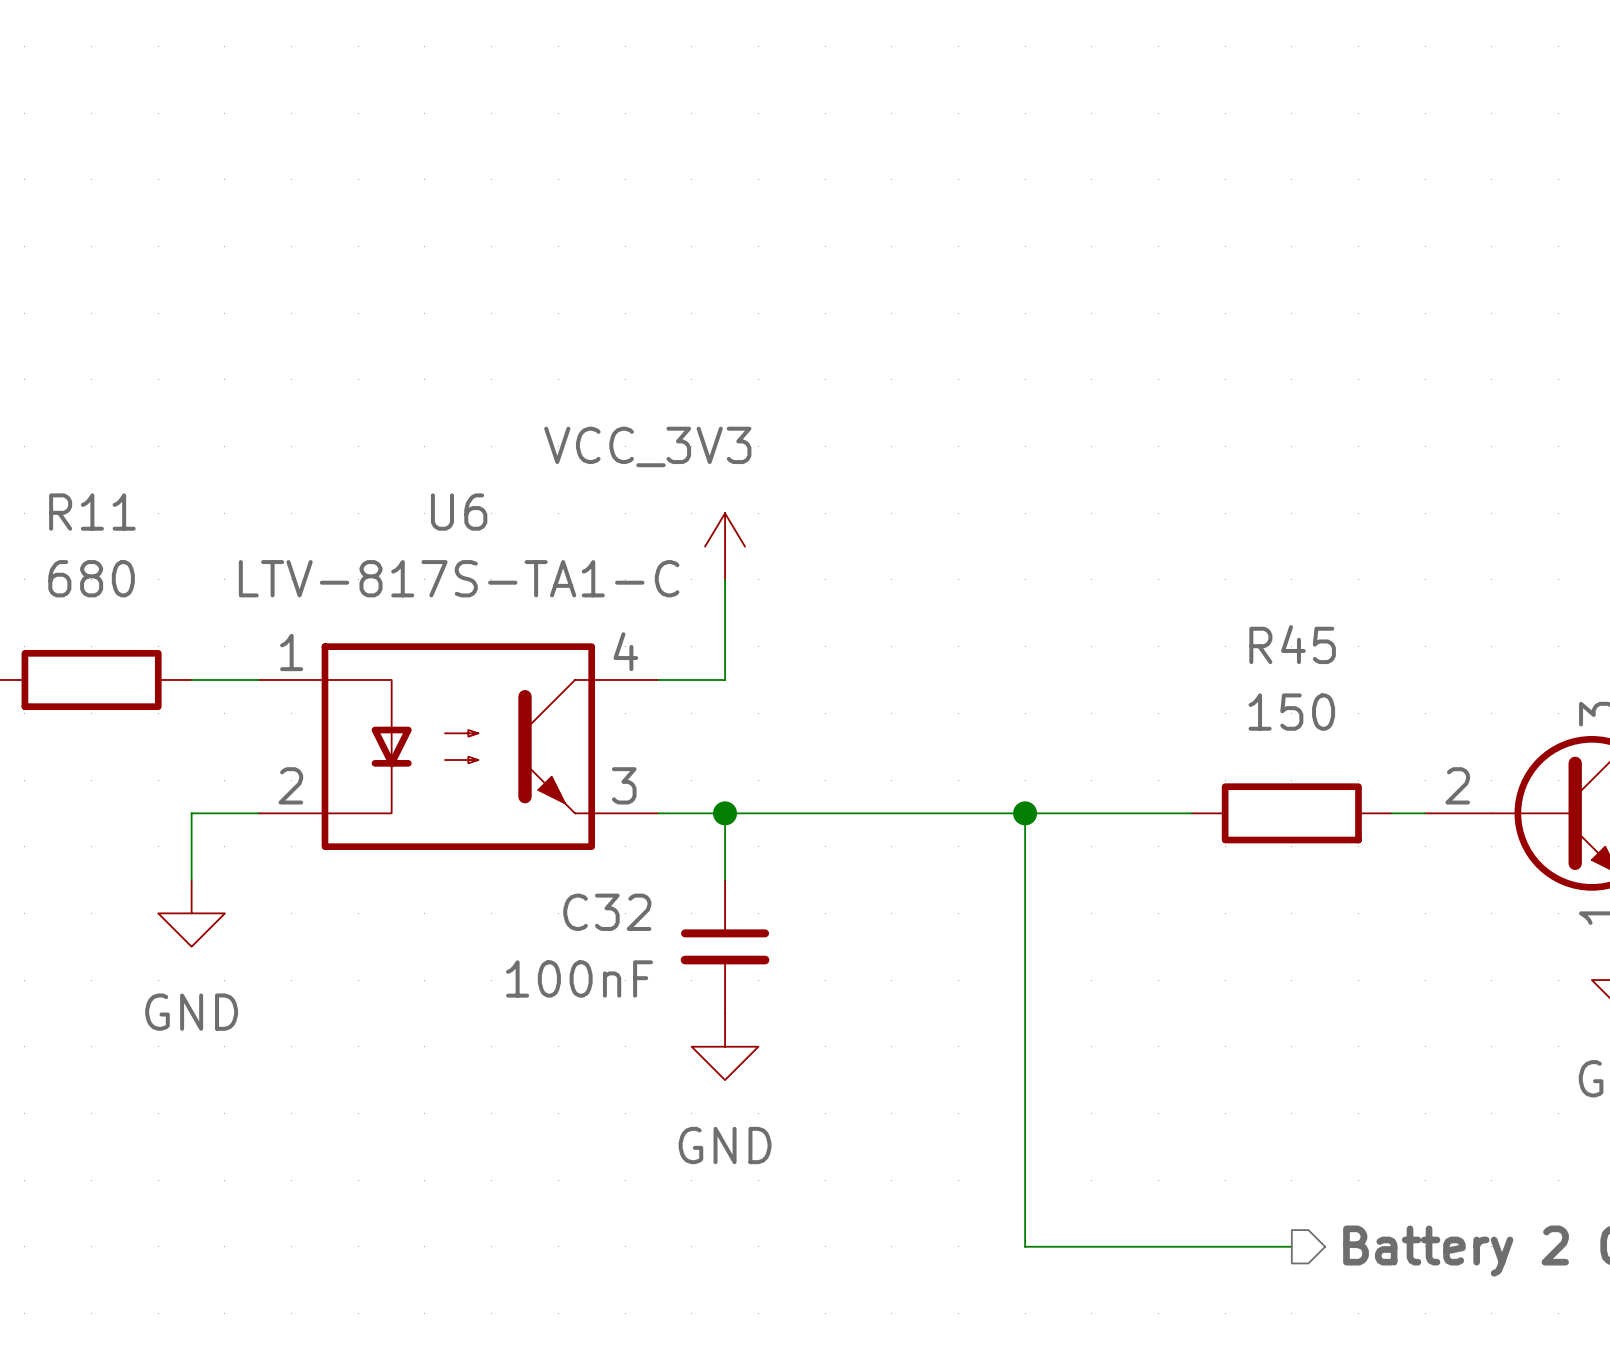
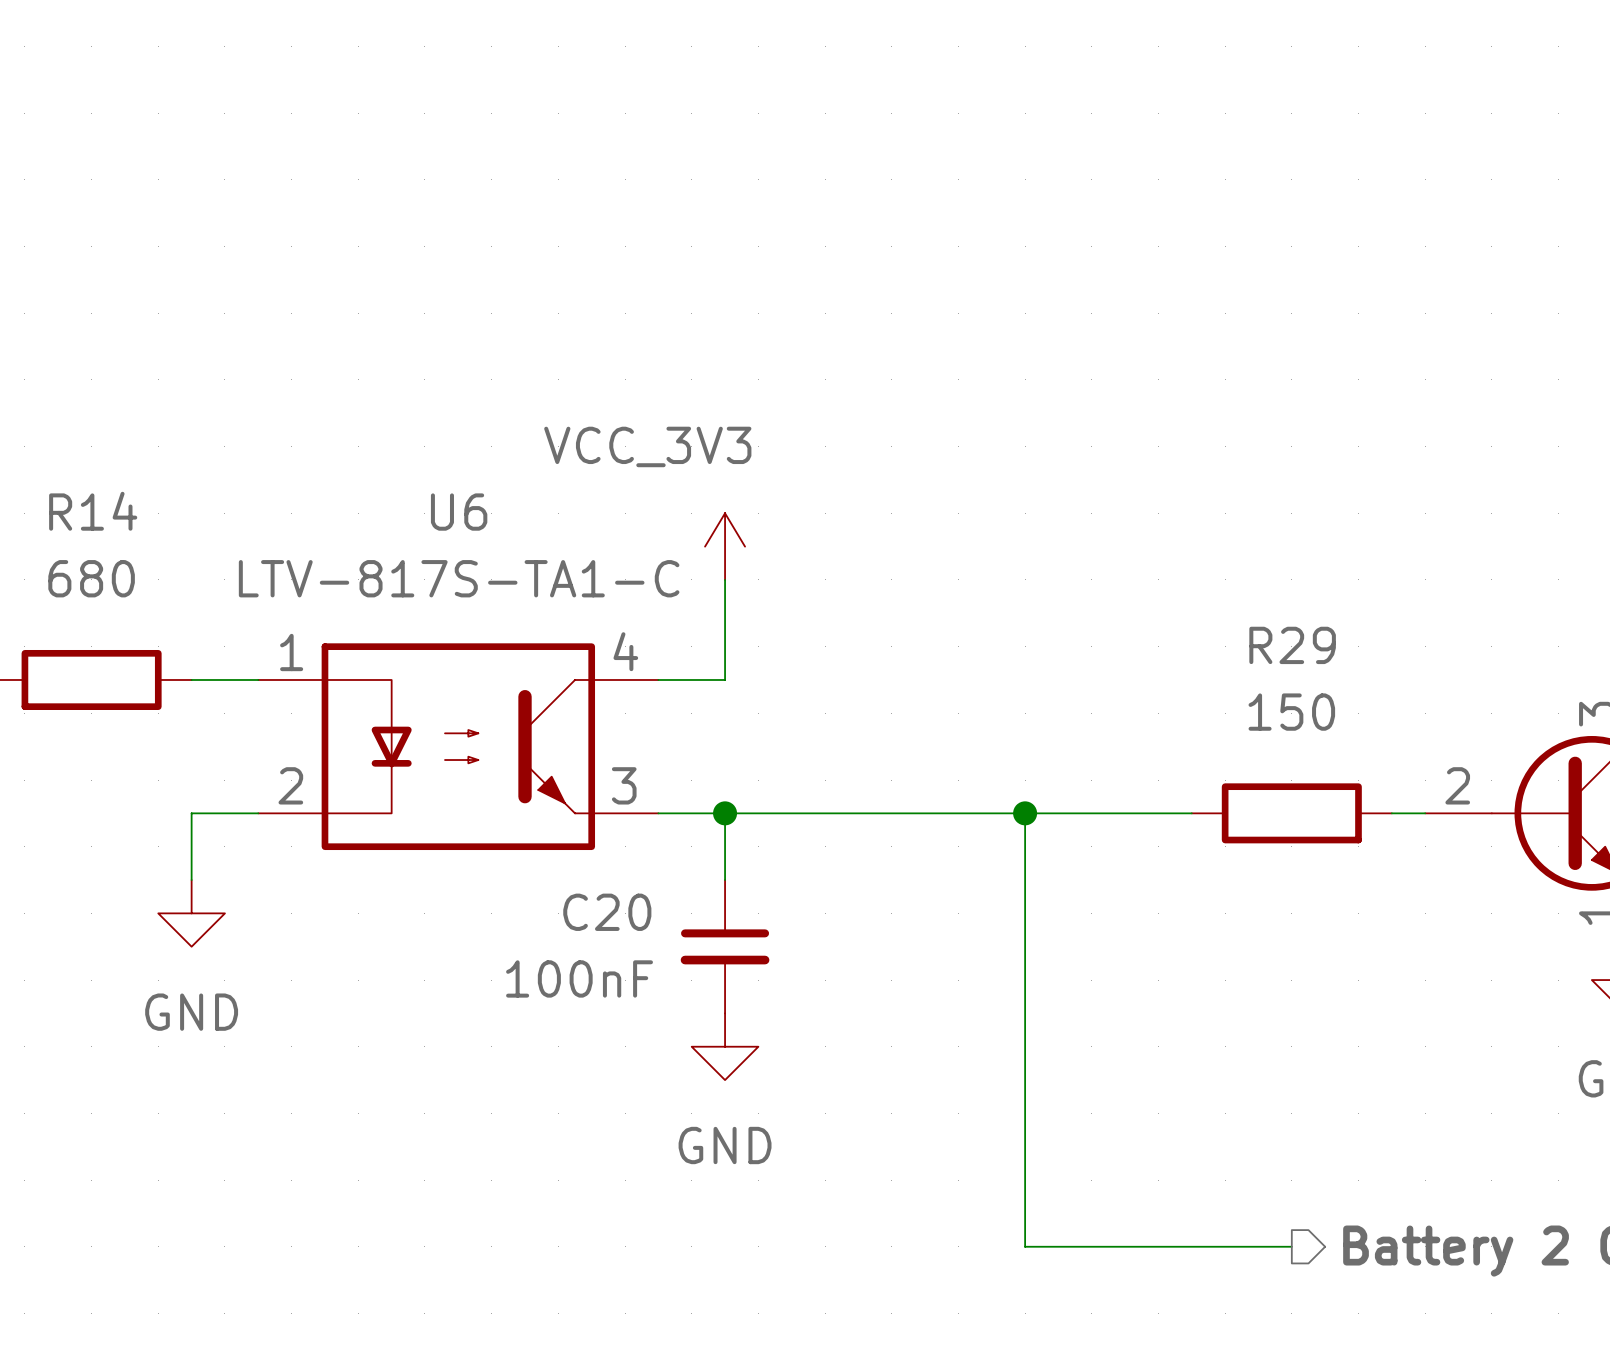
R11 name: R11 (92, 512) -> R14 (93, 511)
R45 name: R45 (1292, 644) -> R29 (1292, 645)
C32 name: C32 (607, 912) -> C20 (607, 912)

